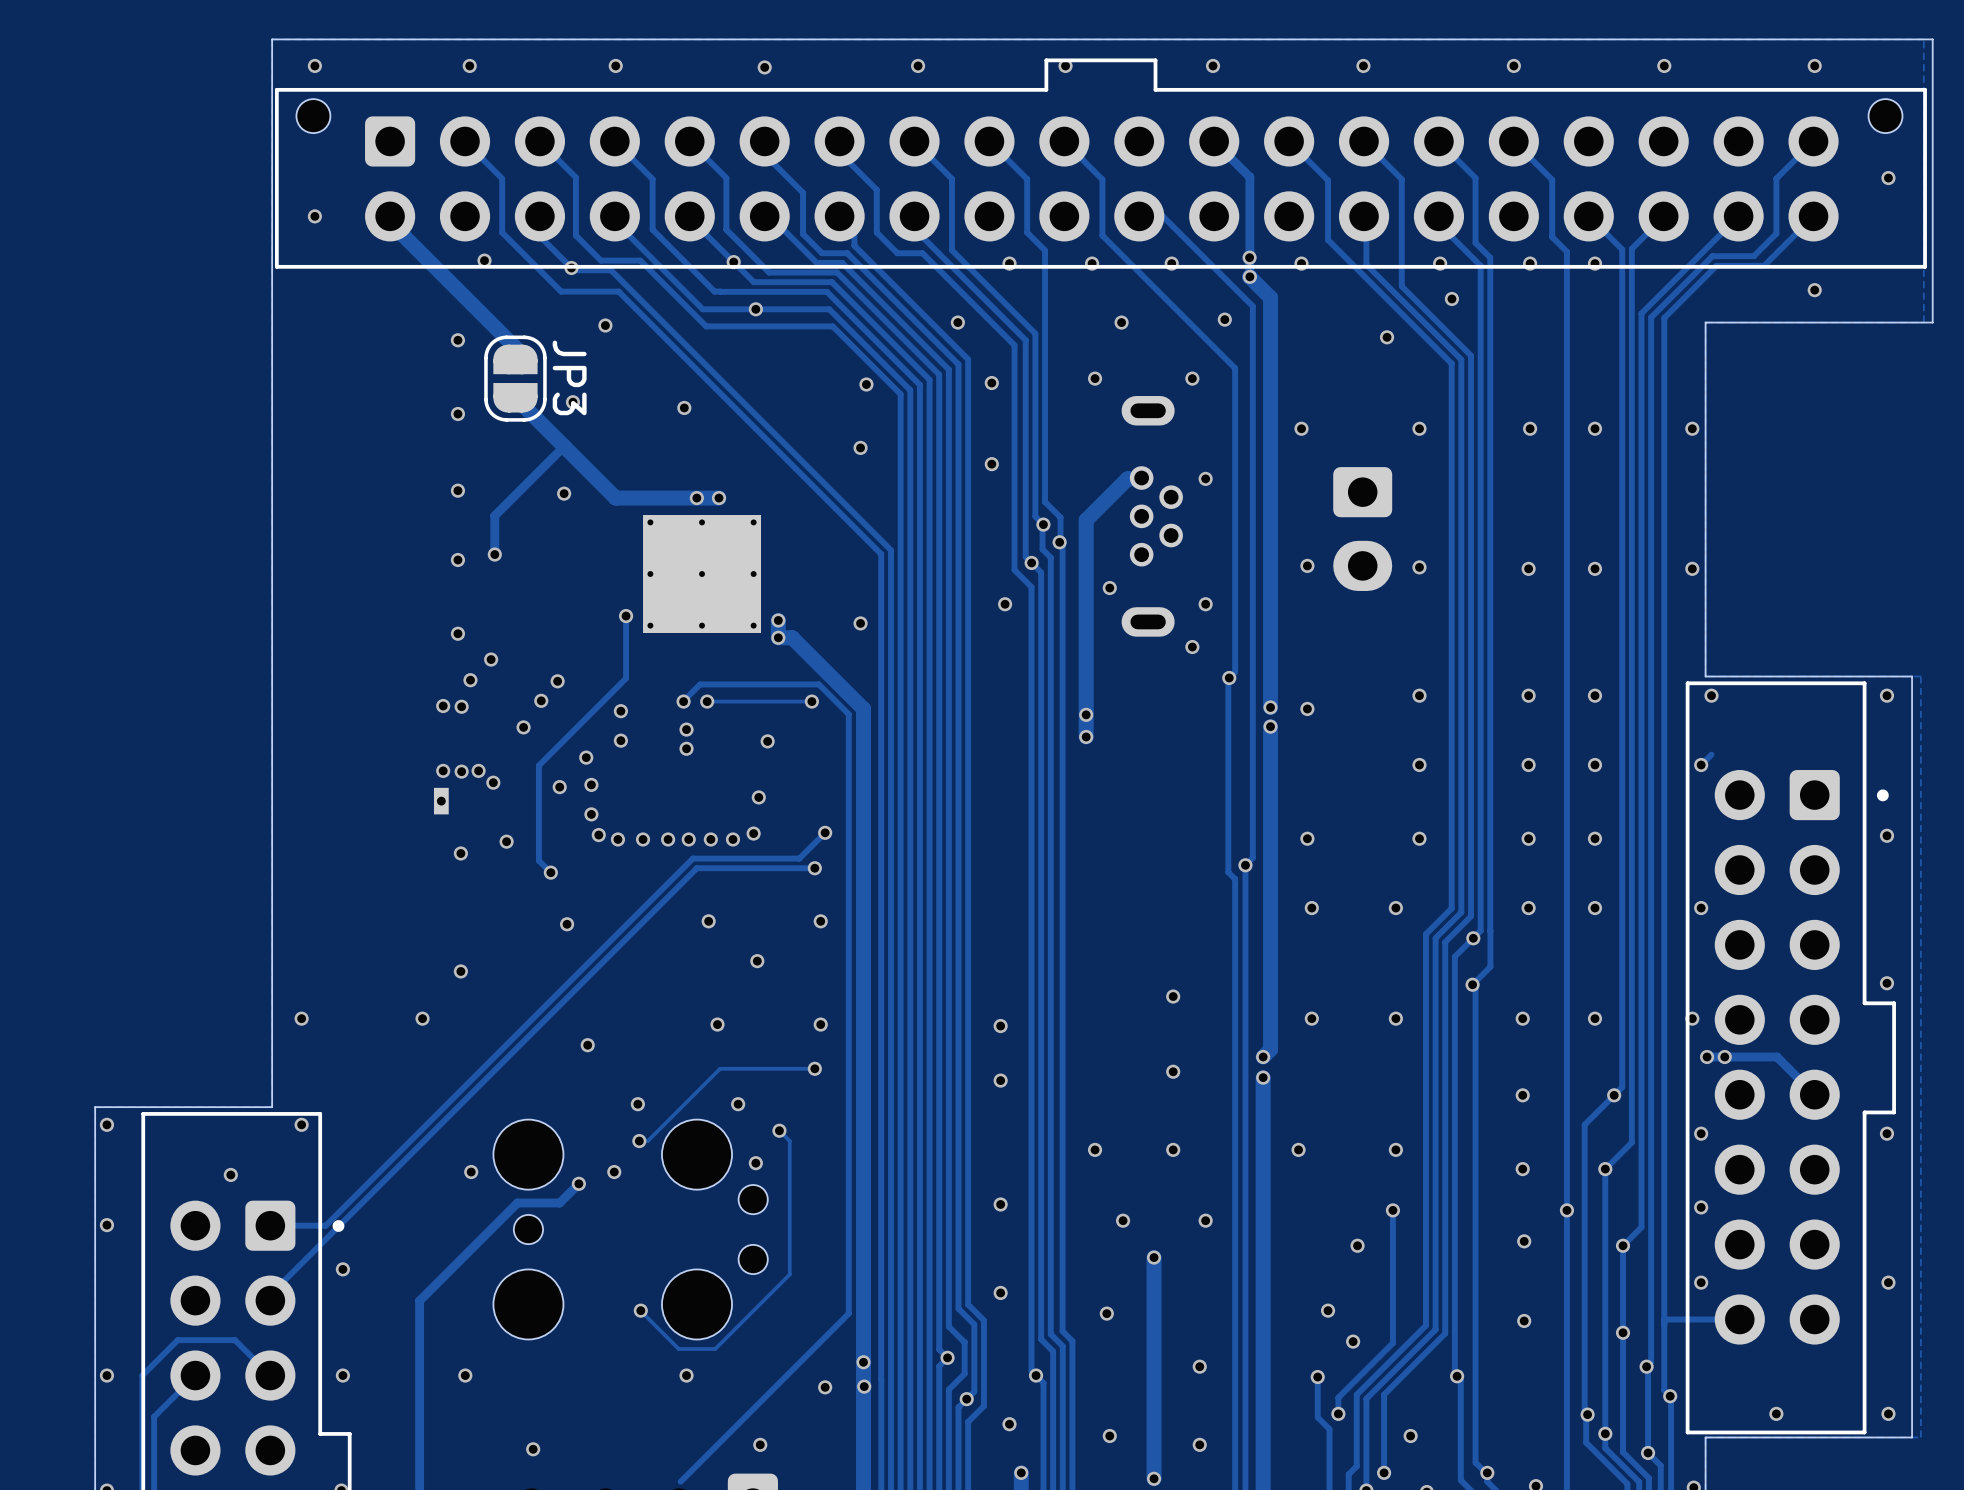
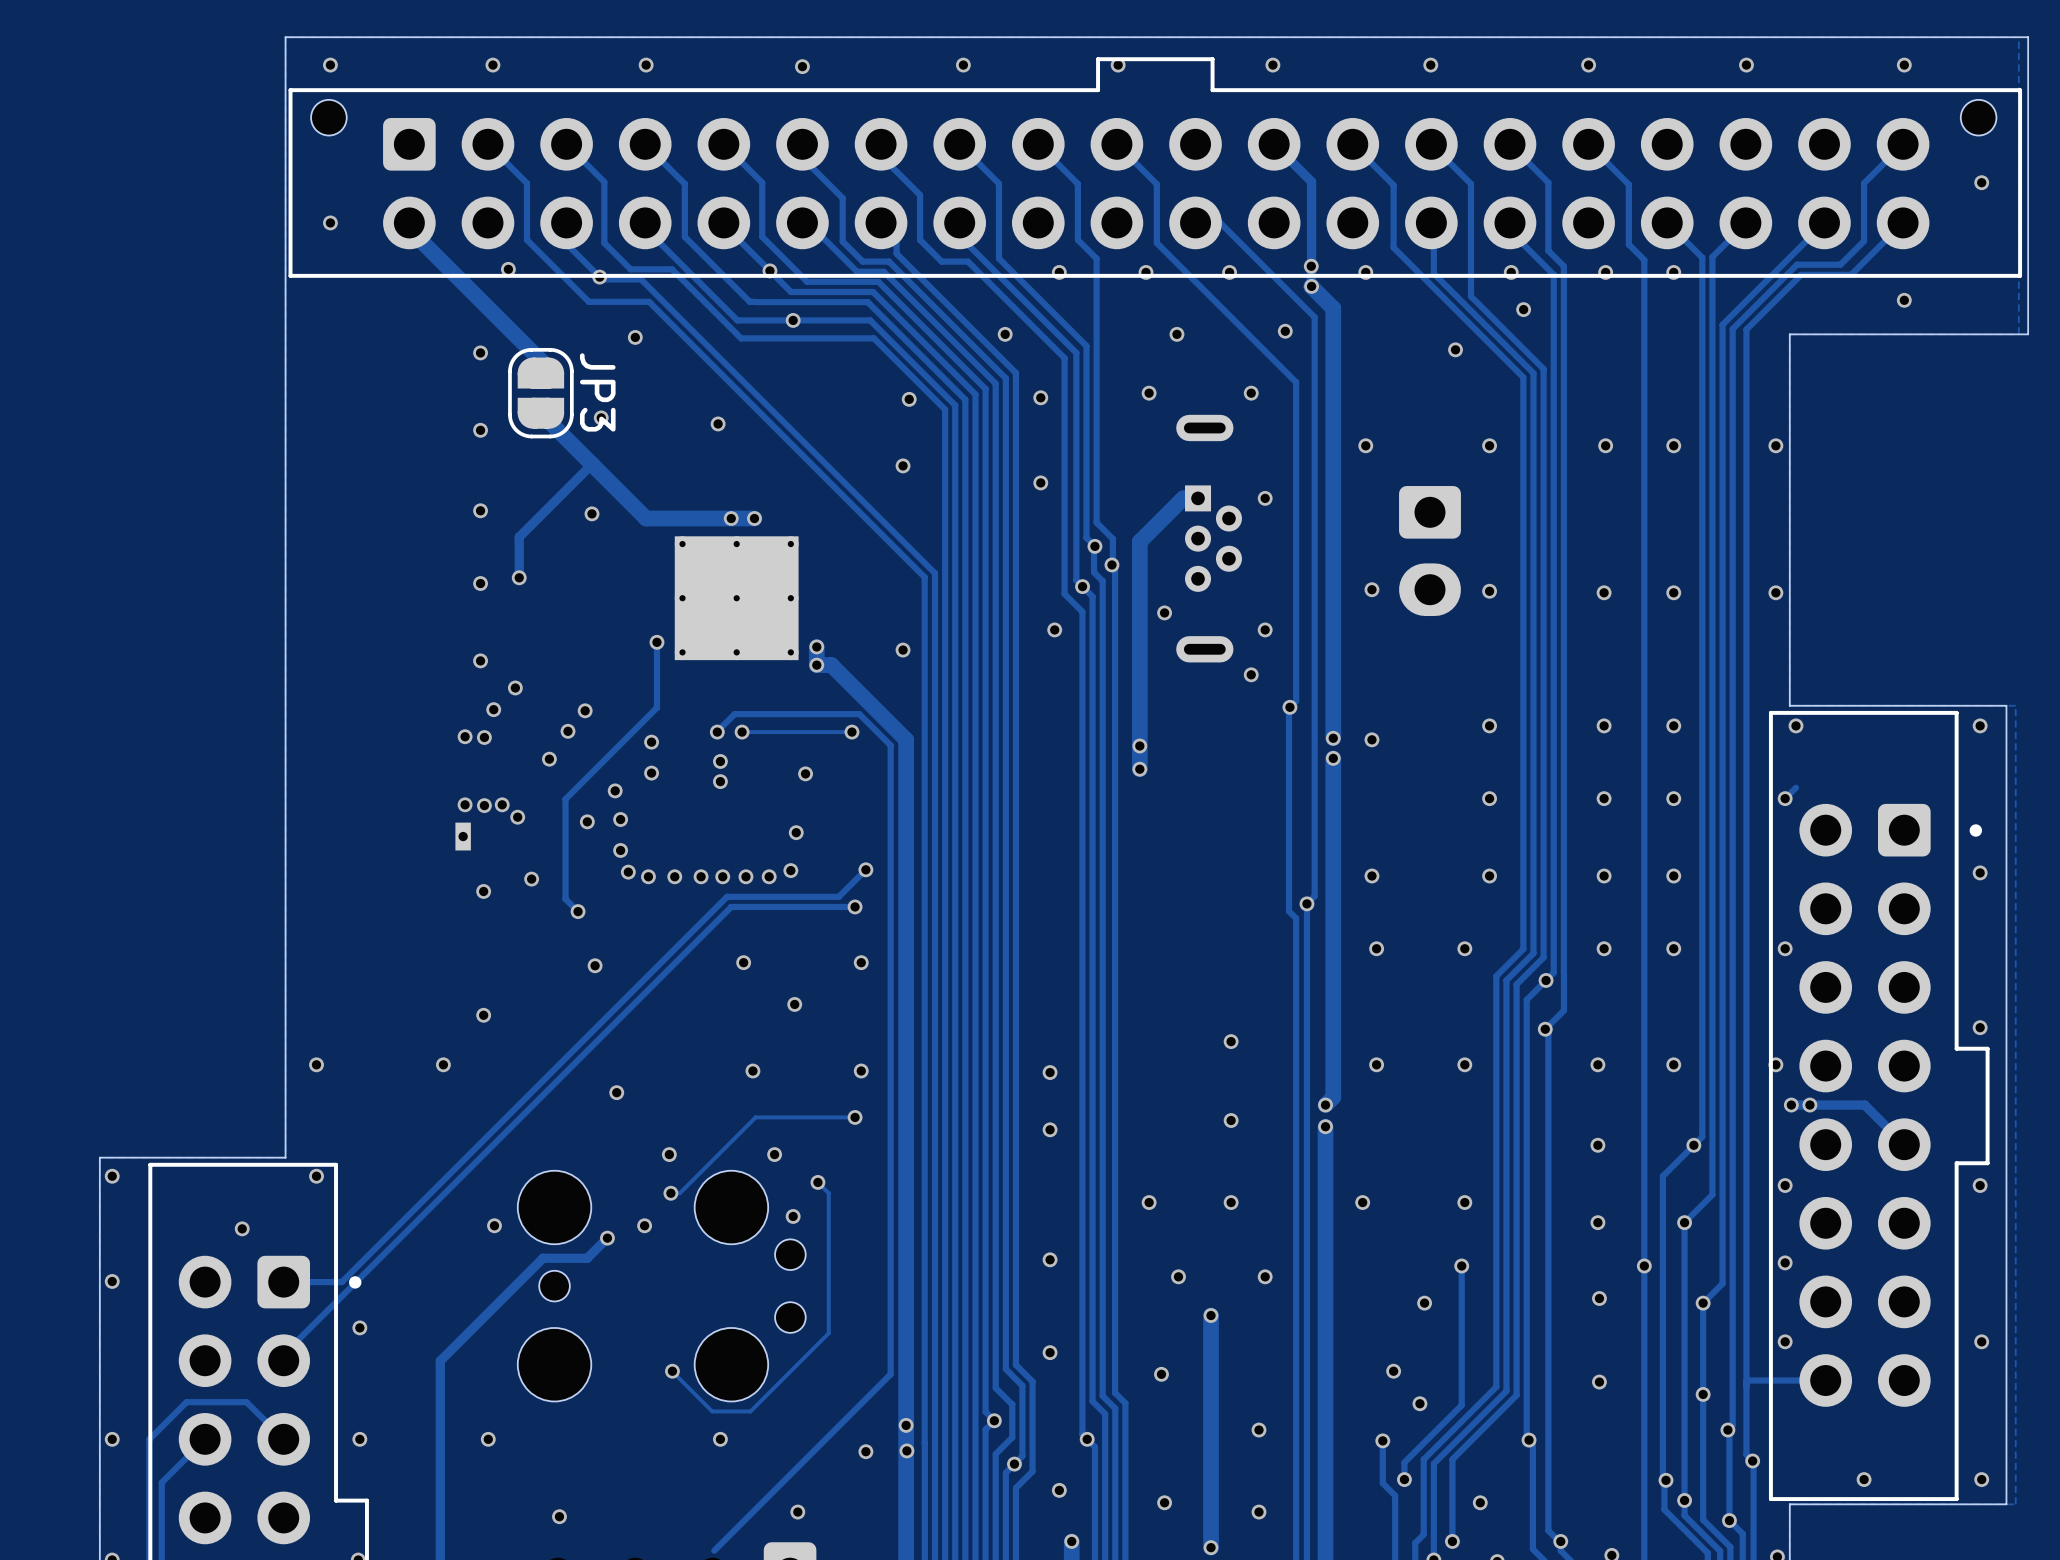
part footprint: [1121, 396, 1183, 637] -> [1176, 414, 1242, 663]

